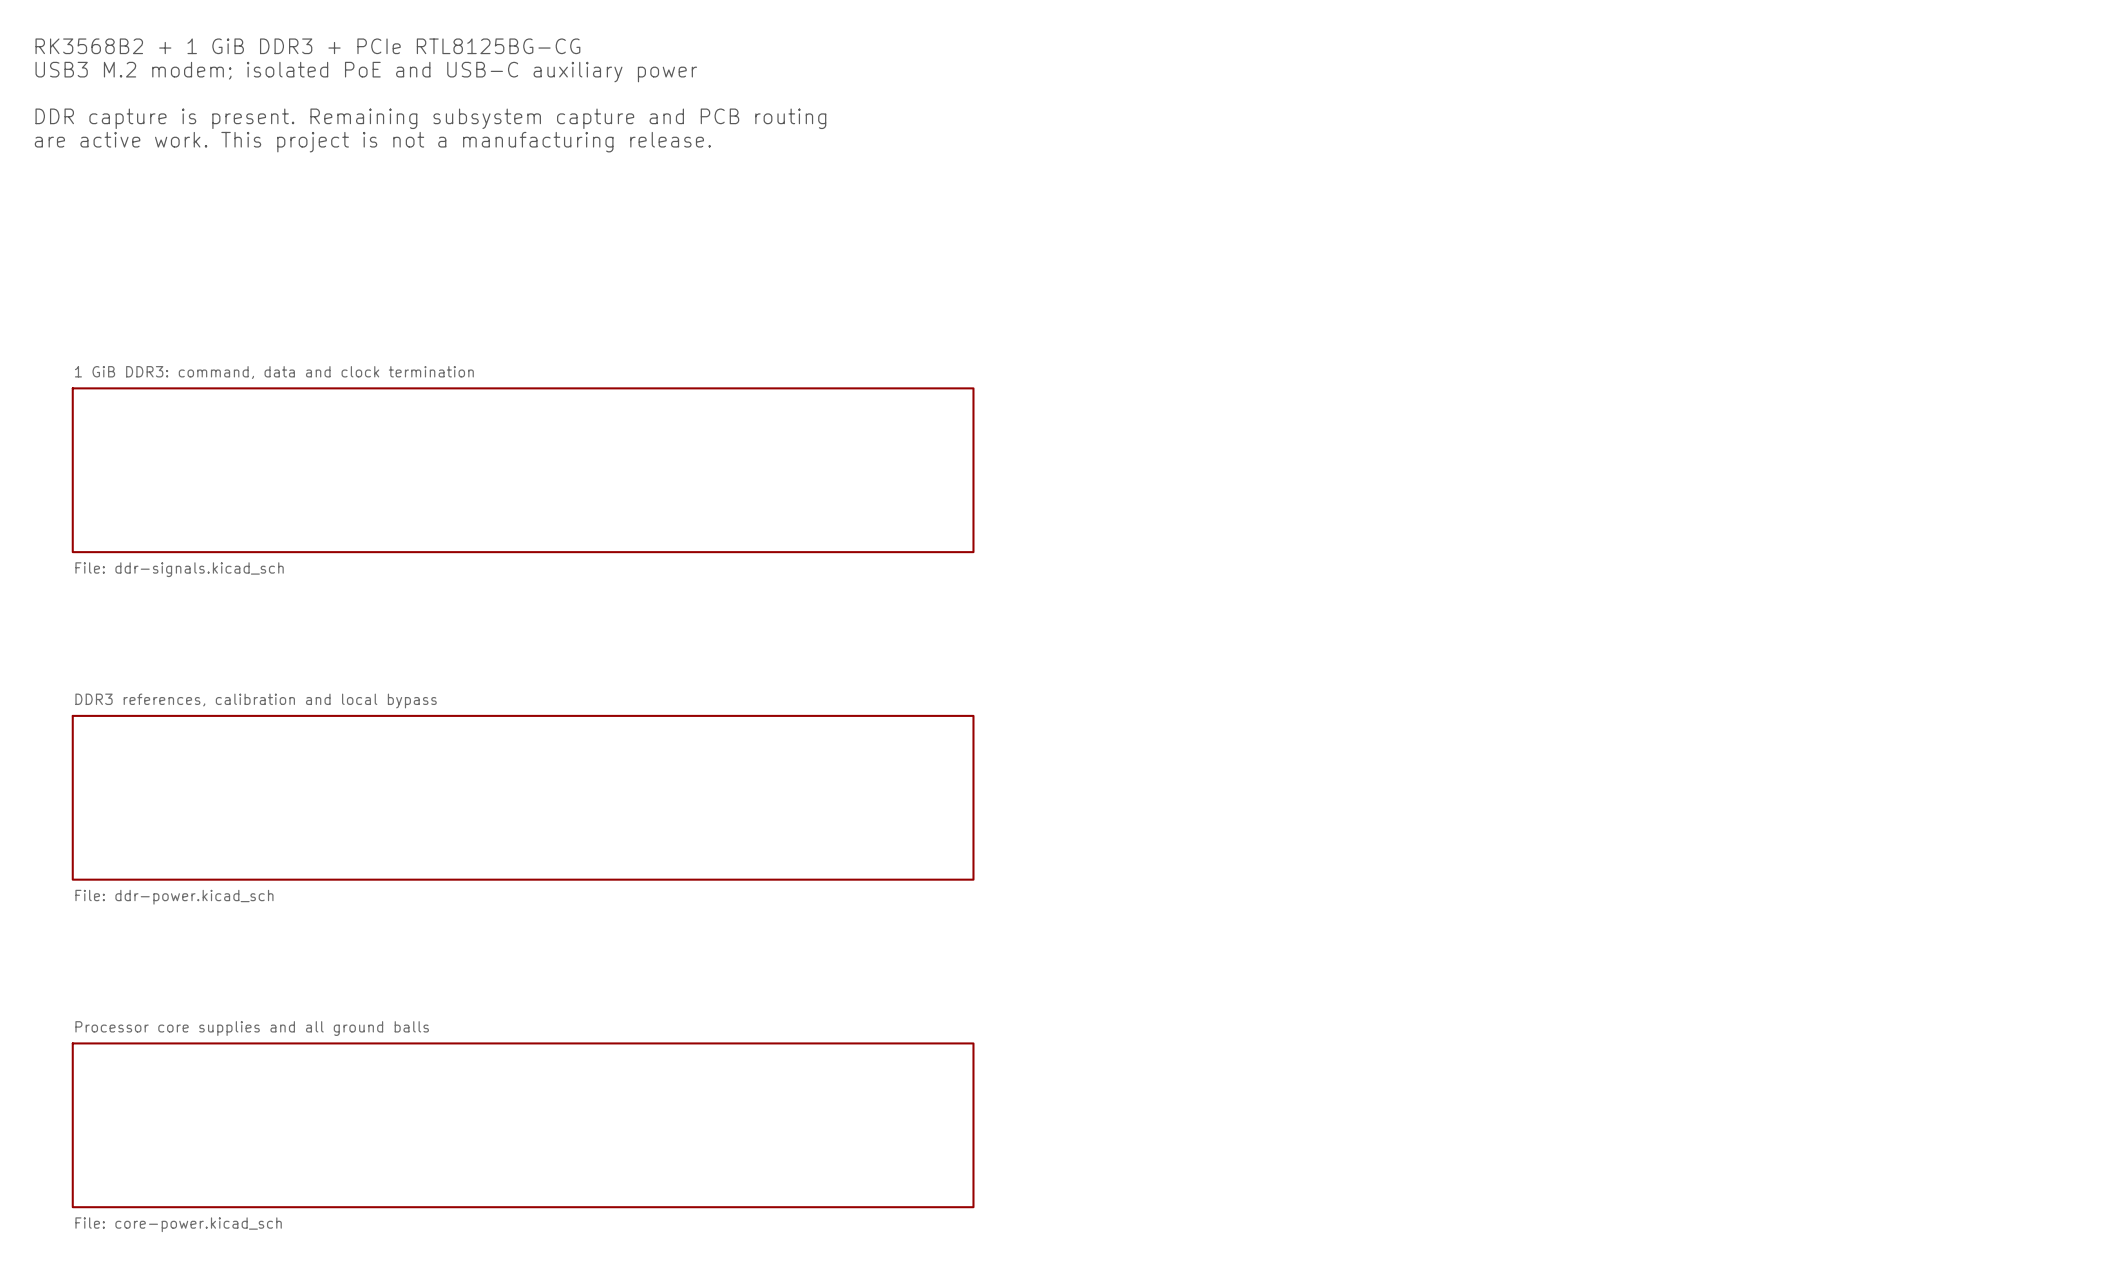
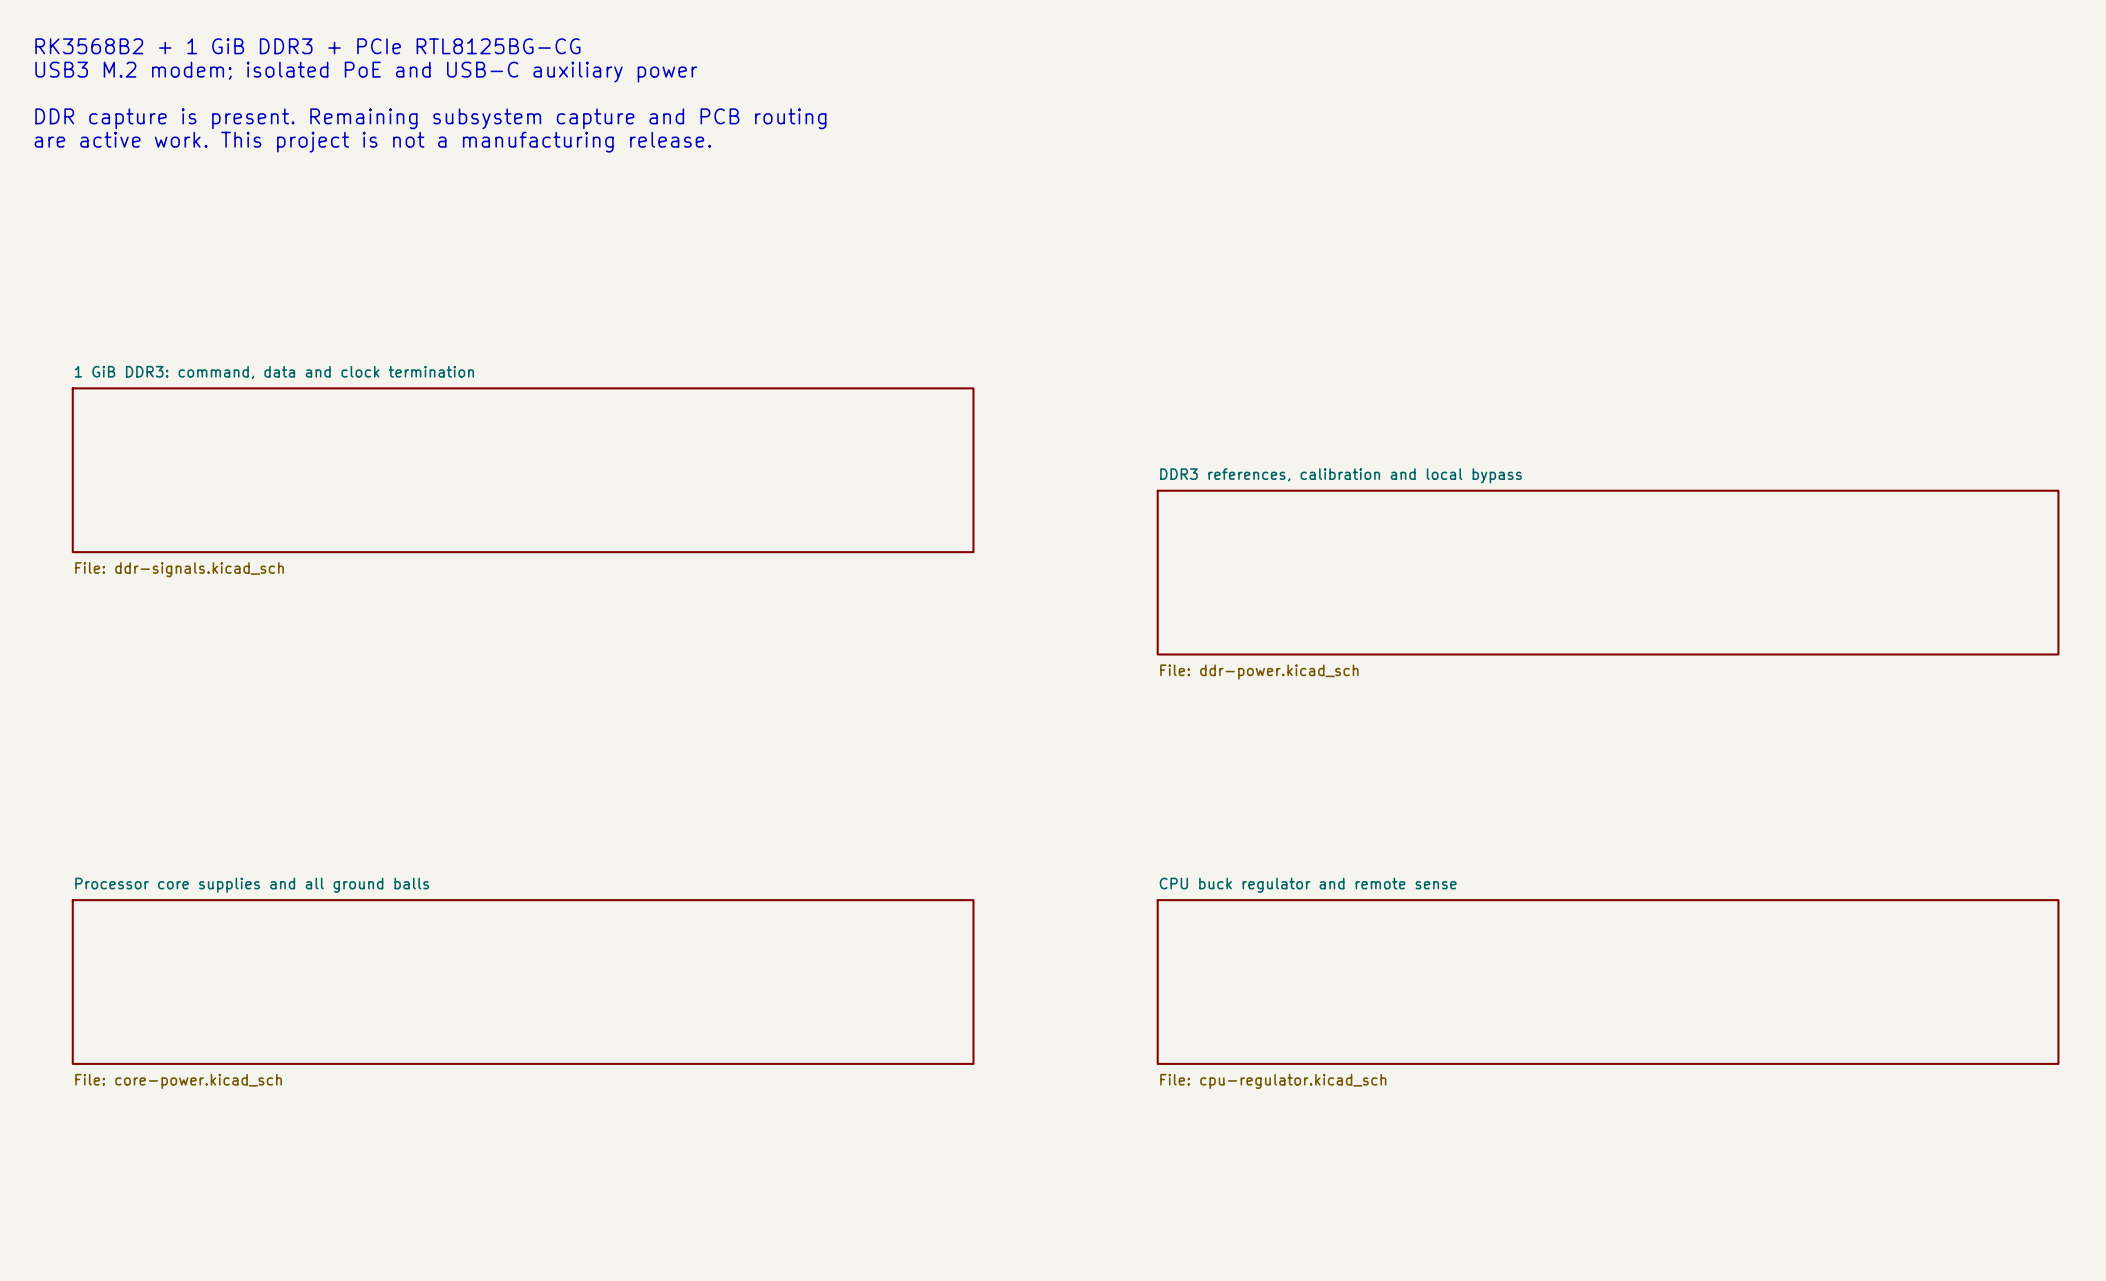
sheet DDR3 references, calibration and local bypass position: (523, 797) -> (1608, 572)
sheet CPU buck regulator and remote sense: none -> File: cpu-regulator.kicad_sch (1608, 982)
sheet Processor core supplies and all ground balls position: (523, 1125) -> (523, 982)

